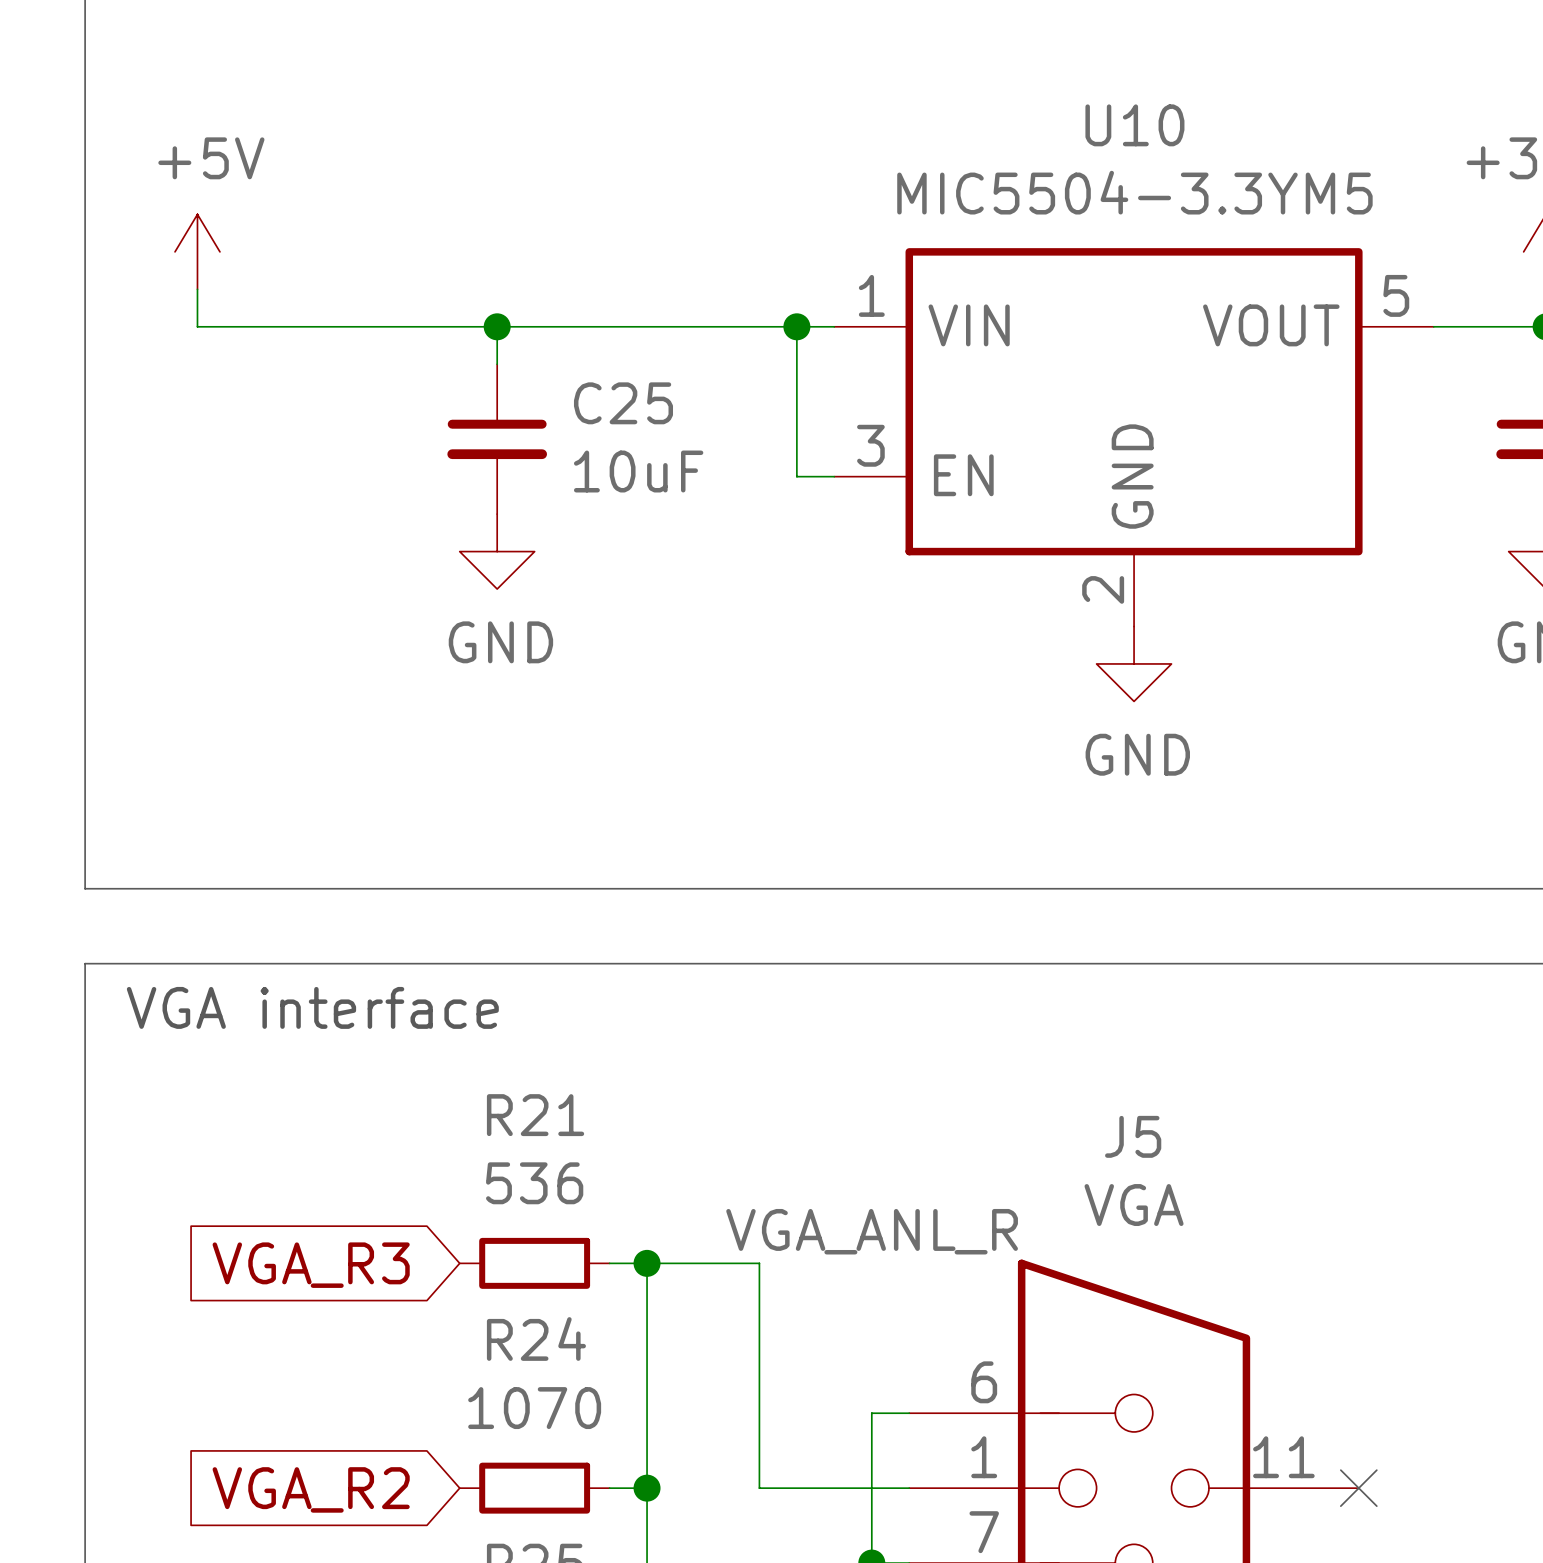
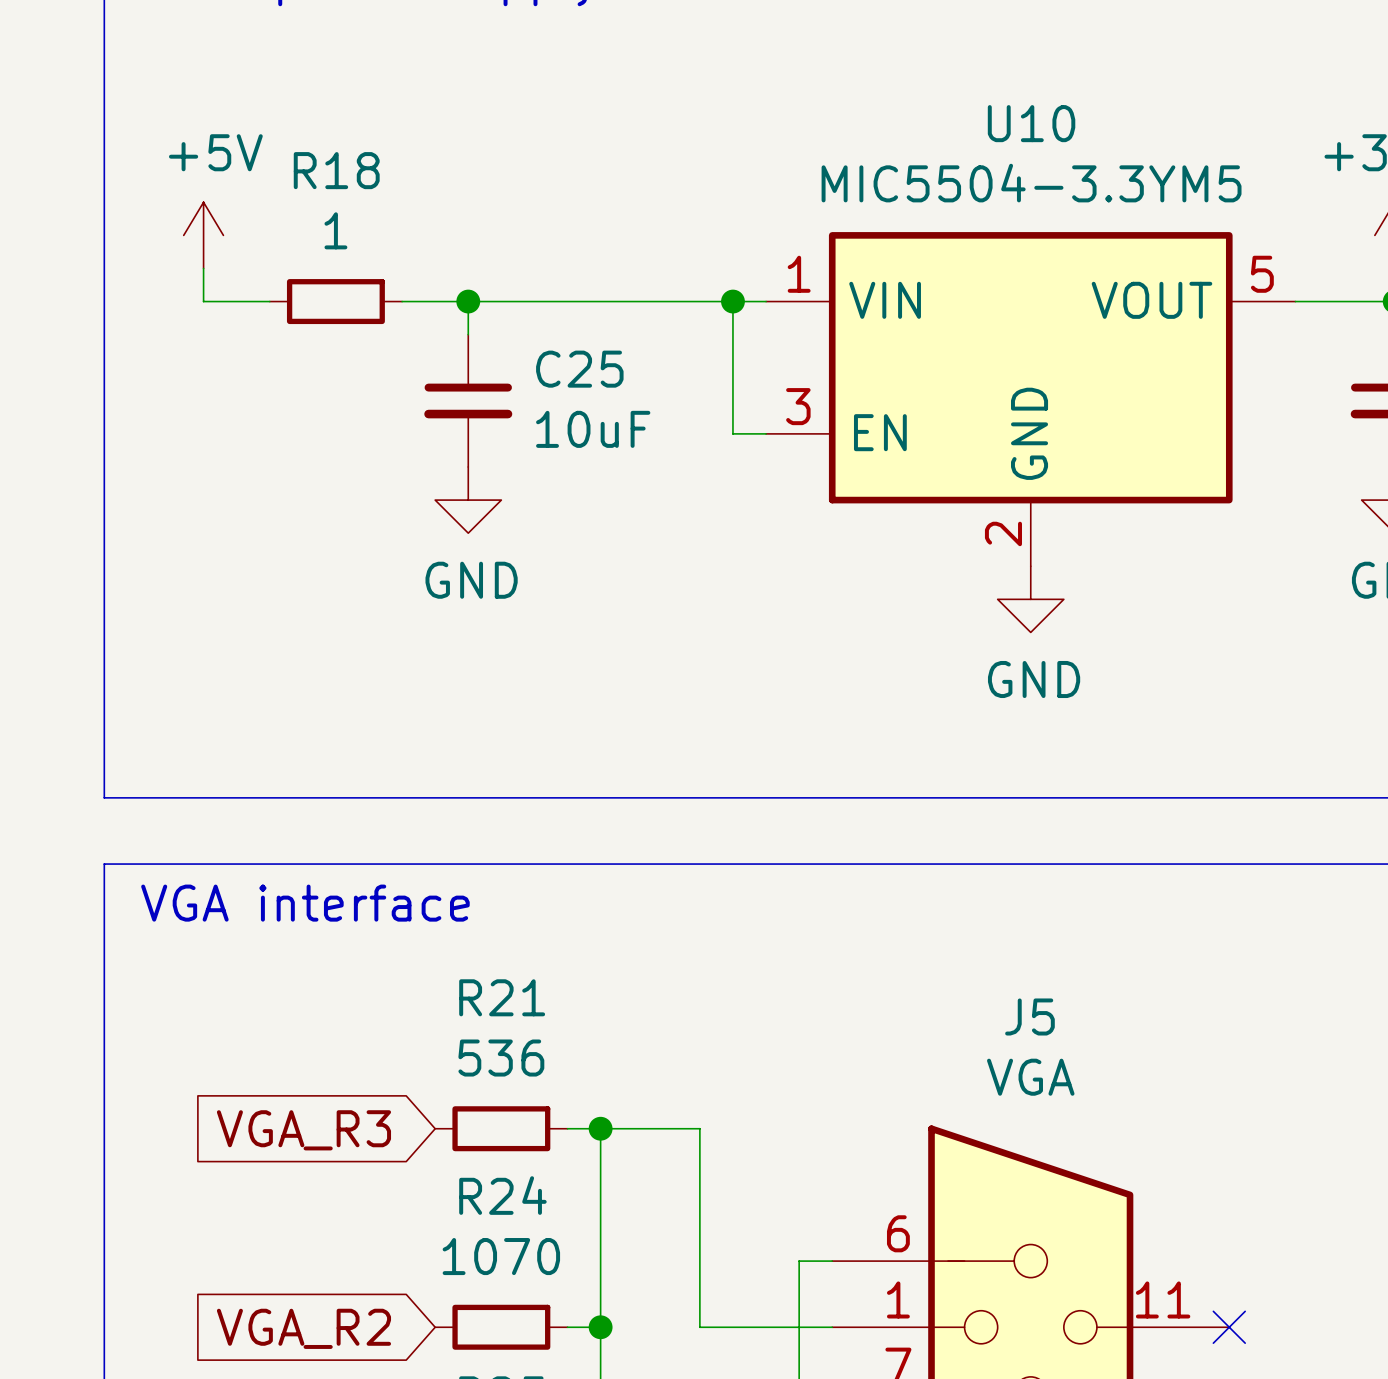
wire: (272, 326) (422, 326) -> none
R18: none -> 1 (335, 301)
label: VGA_ANL_R (872, 1231) -> none

